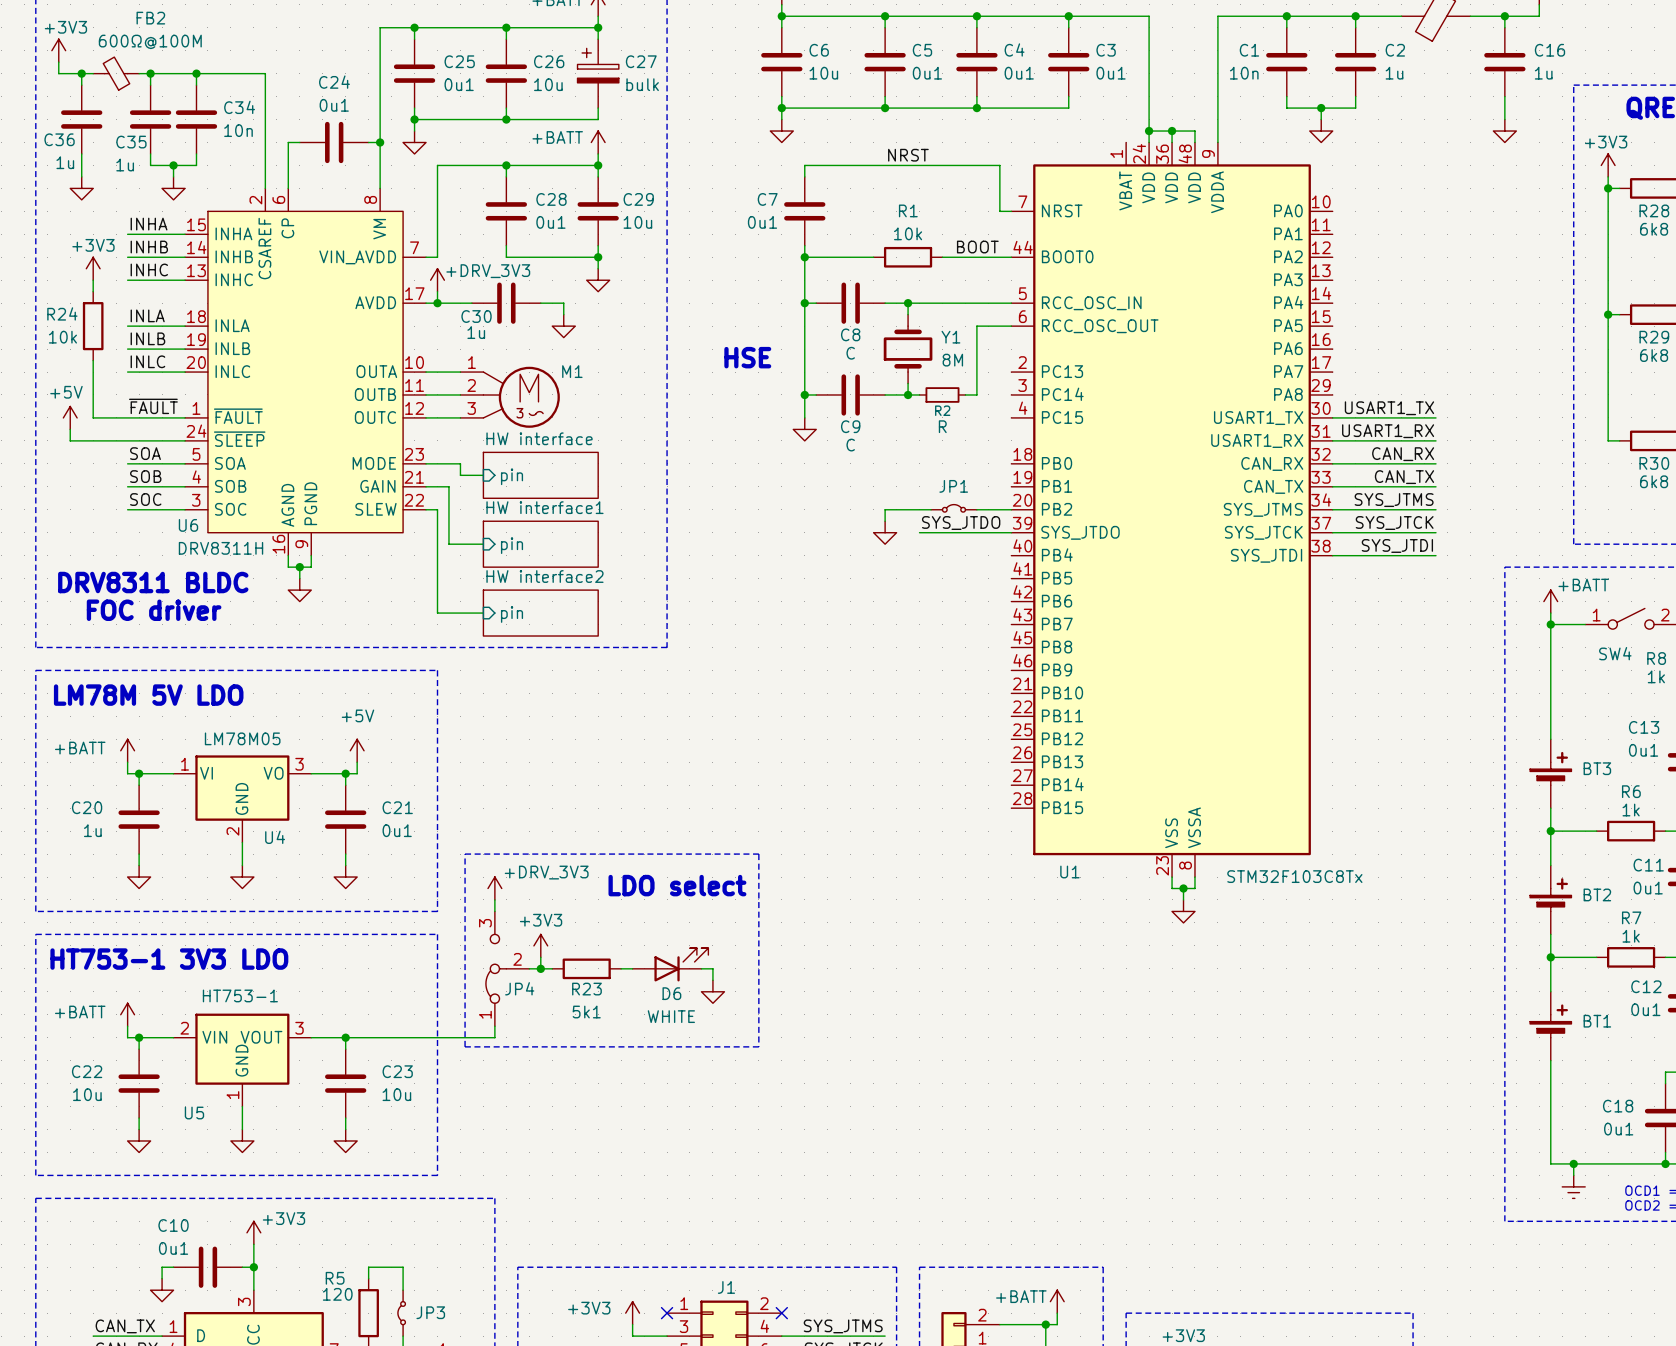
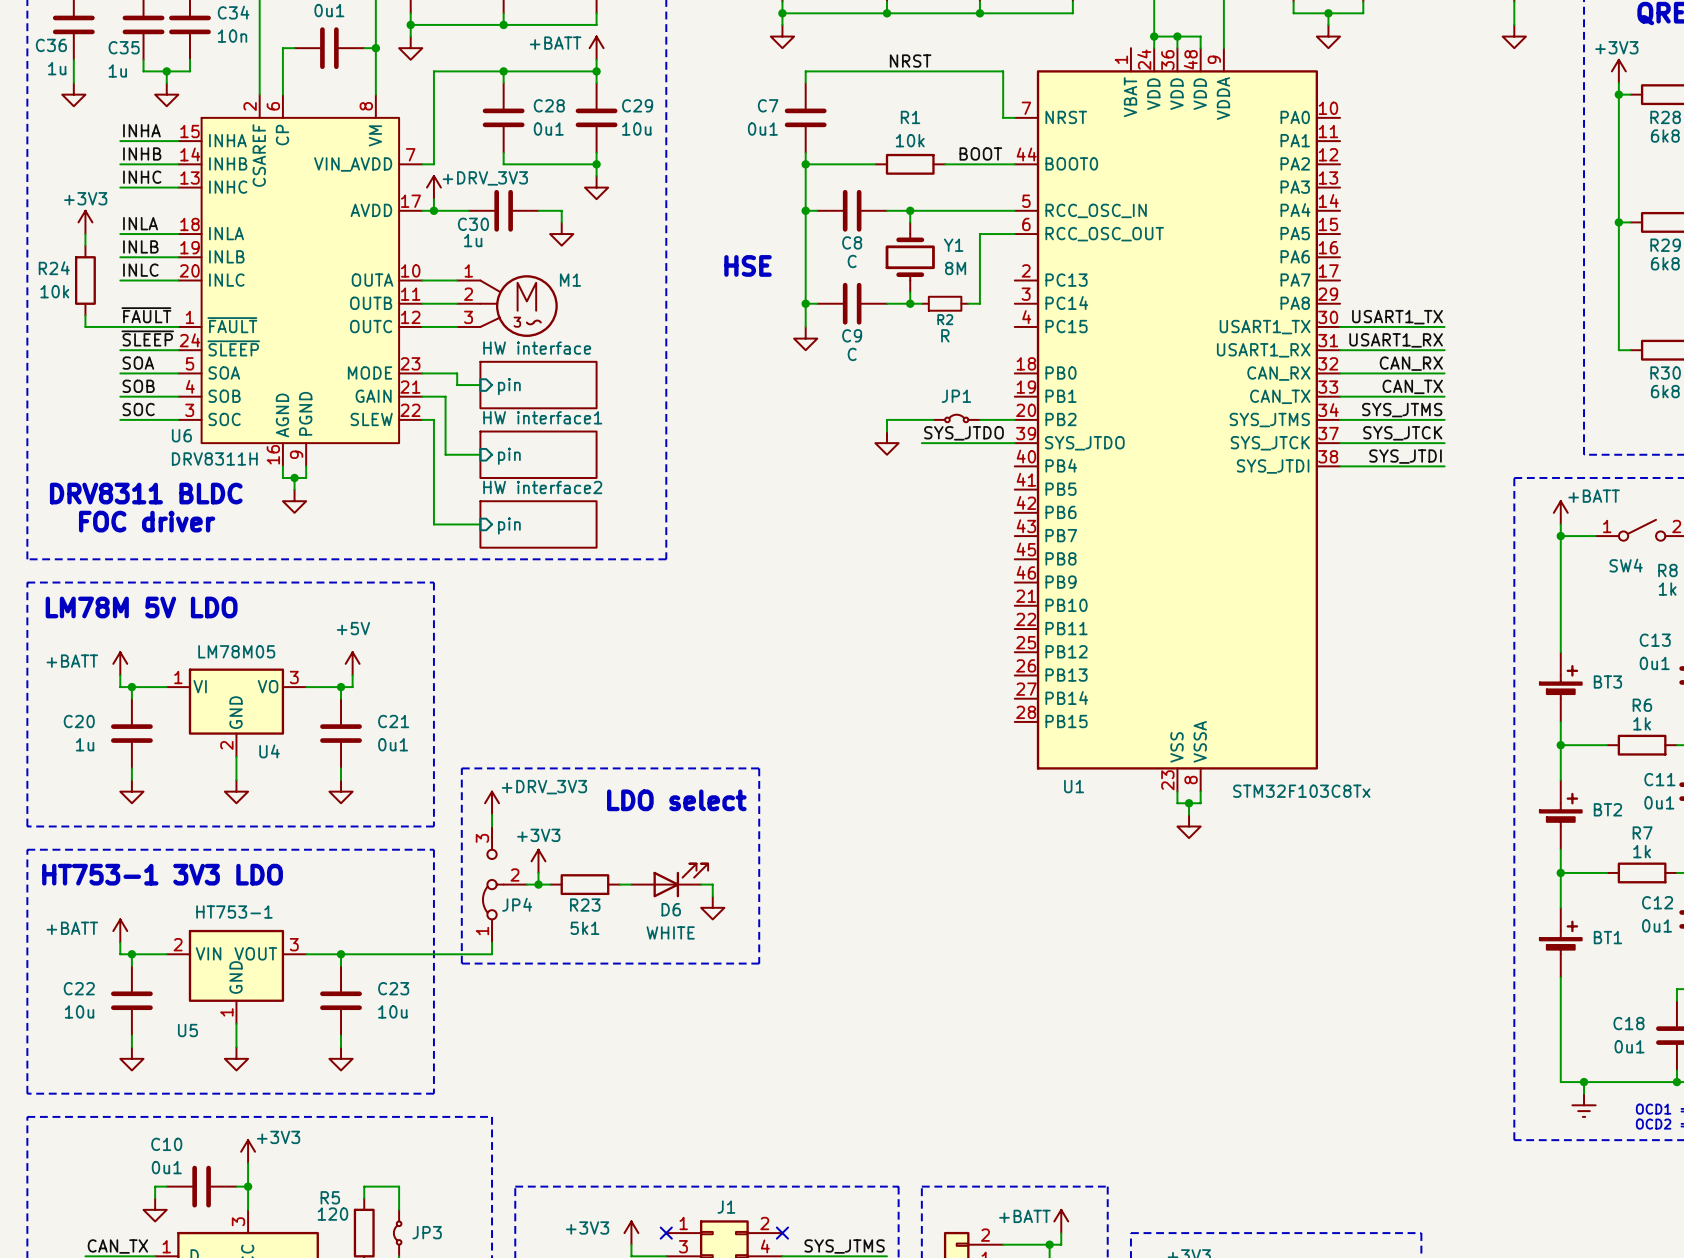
power symbol position: +3V3 (93, 268) -> +3V3 (85, 222)
wire: (93, 280) (93, 291) -> (85, 234) (85, 245)
R24 position: (93, 326) -> (85, 280)
wire: (93, 360) (93, 406) -> none
power symbol: +5V (70, 417) -> none
wire: (70, 429) (70, 440) (127, 440) -> none
label: none -> ~{SLEEP} (147, 338)

